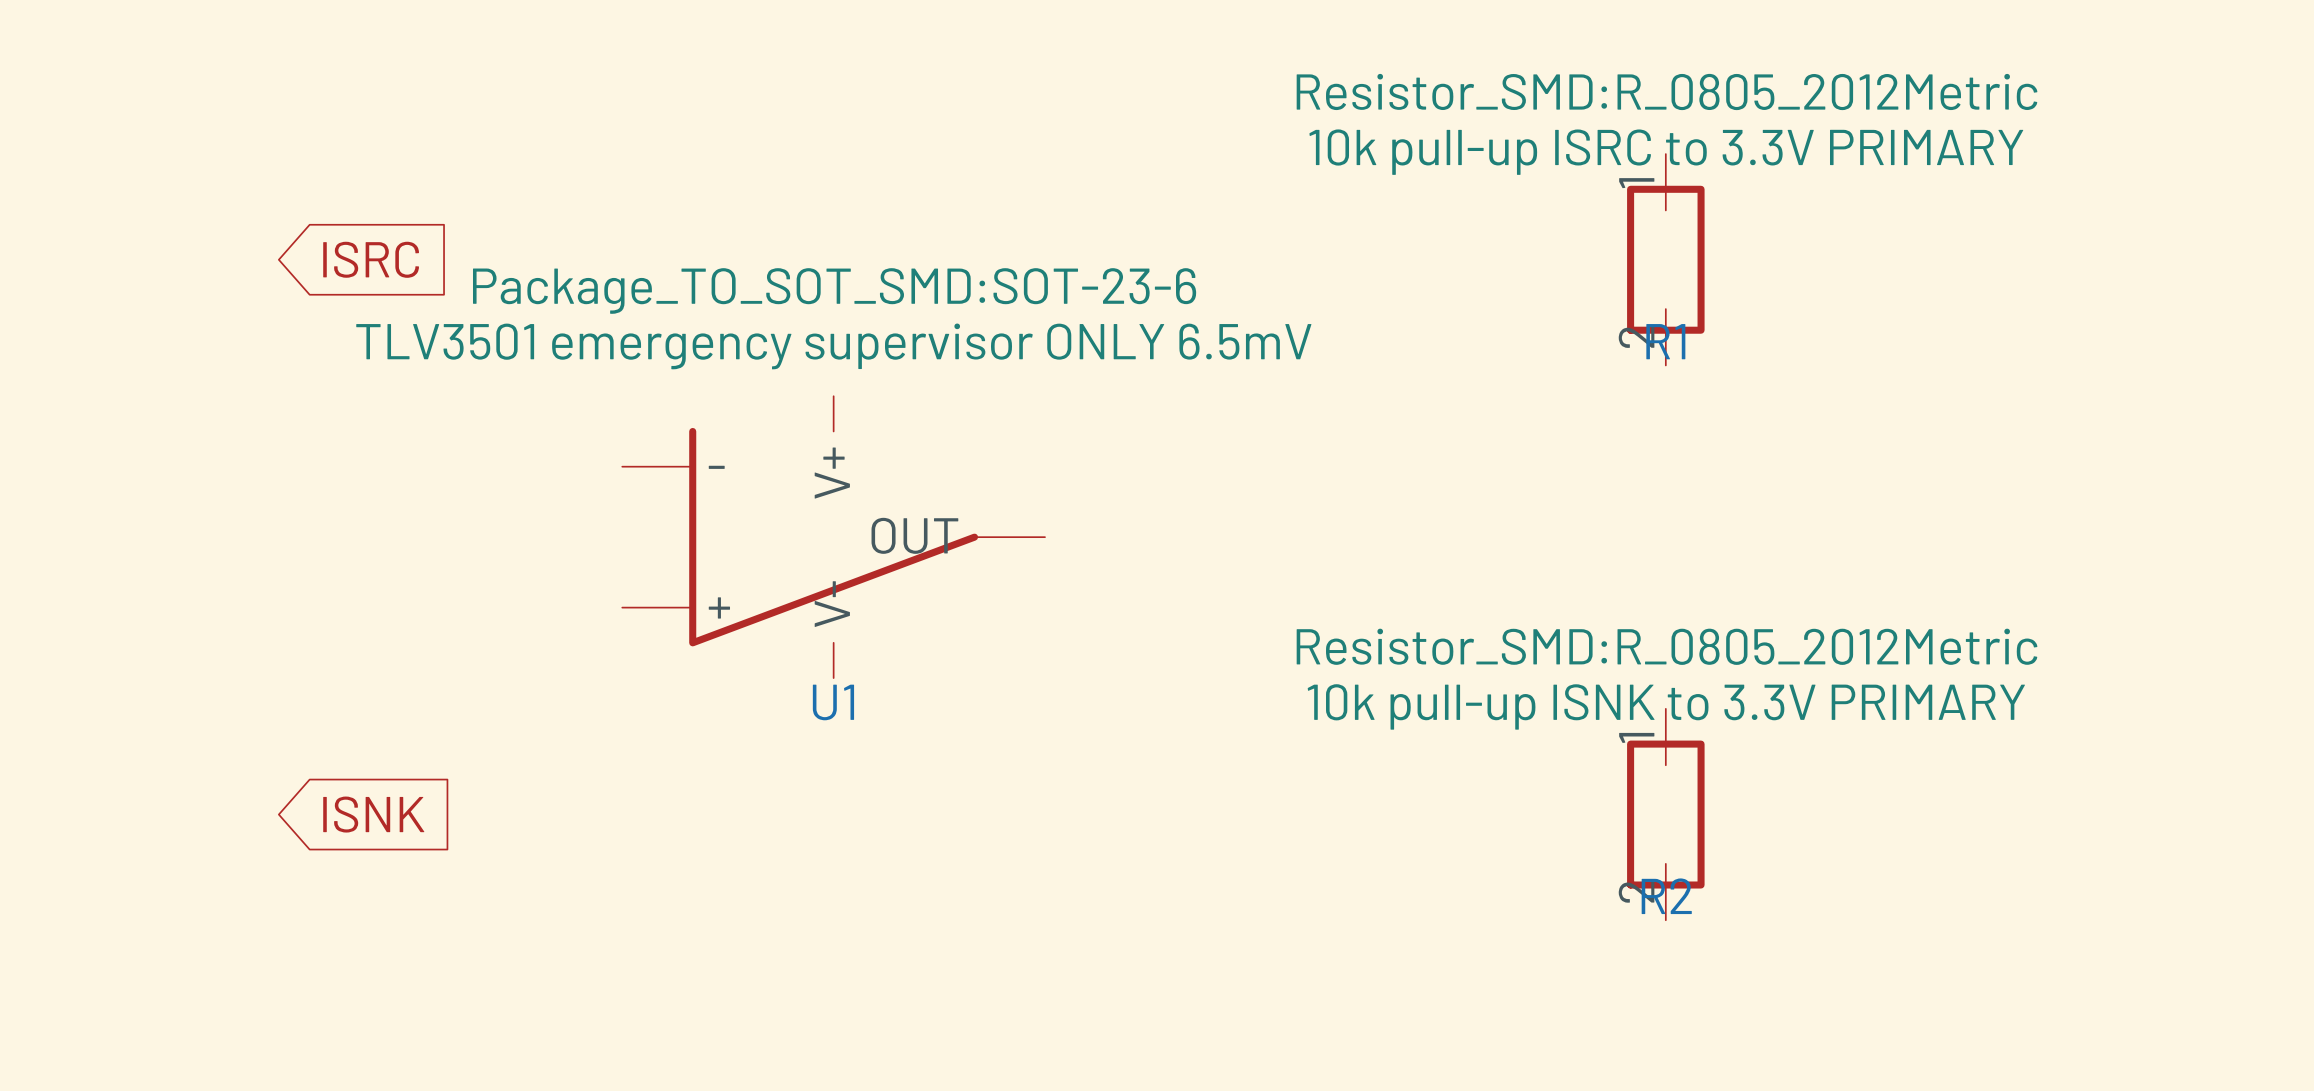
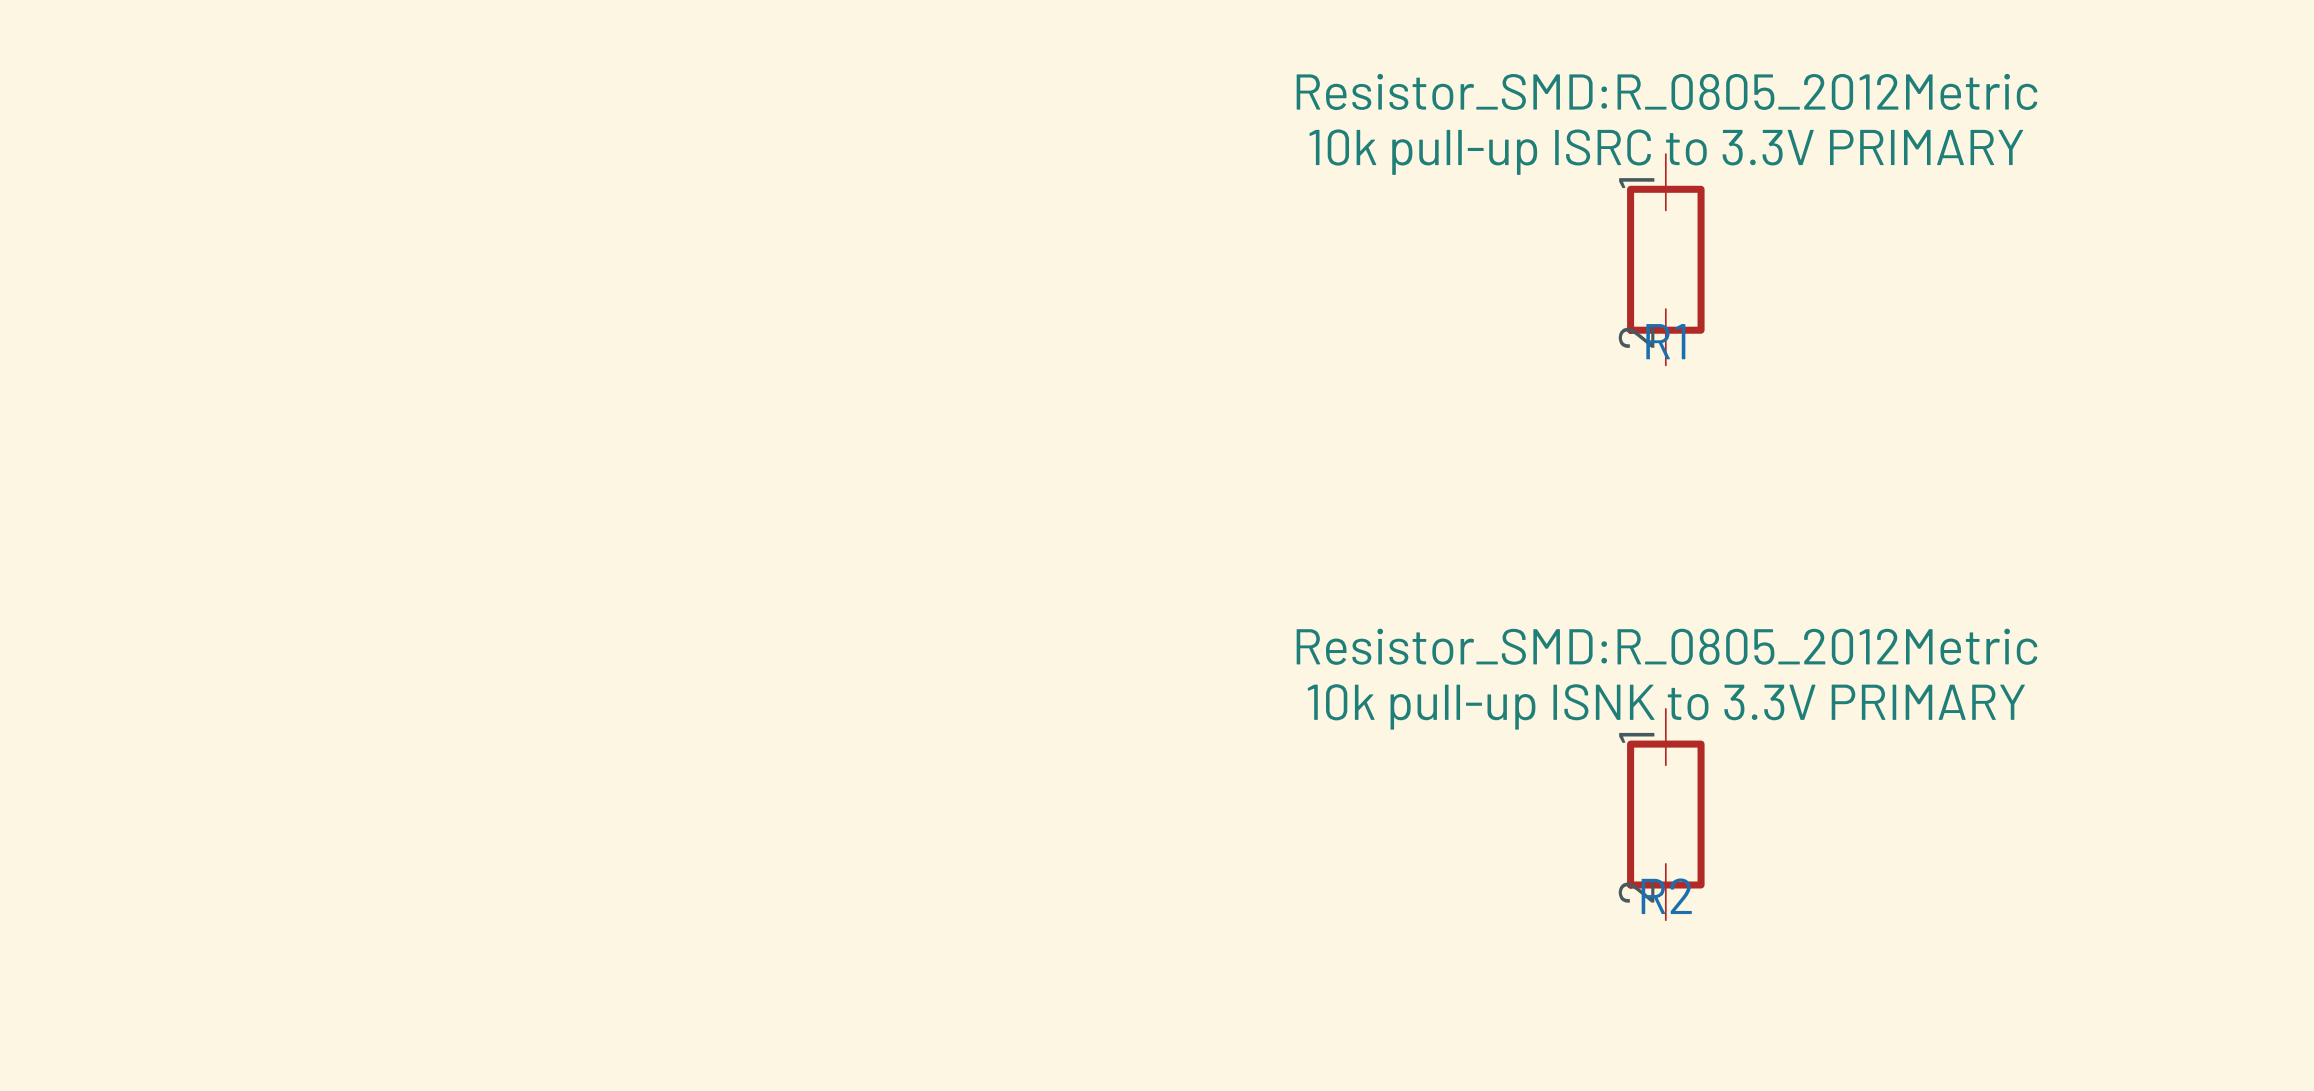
global label: ISRC (371, 259) -> none
U1: TLV3501 emergency supervisor ONLY 6.5mV (833, 537) -> none
global label: ISNK (373, 814) -> none

